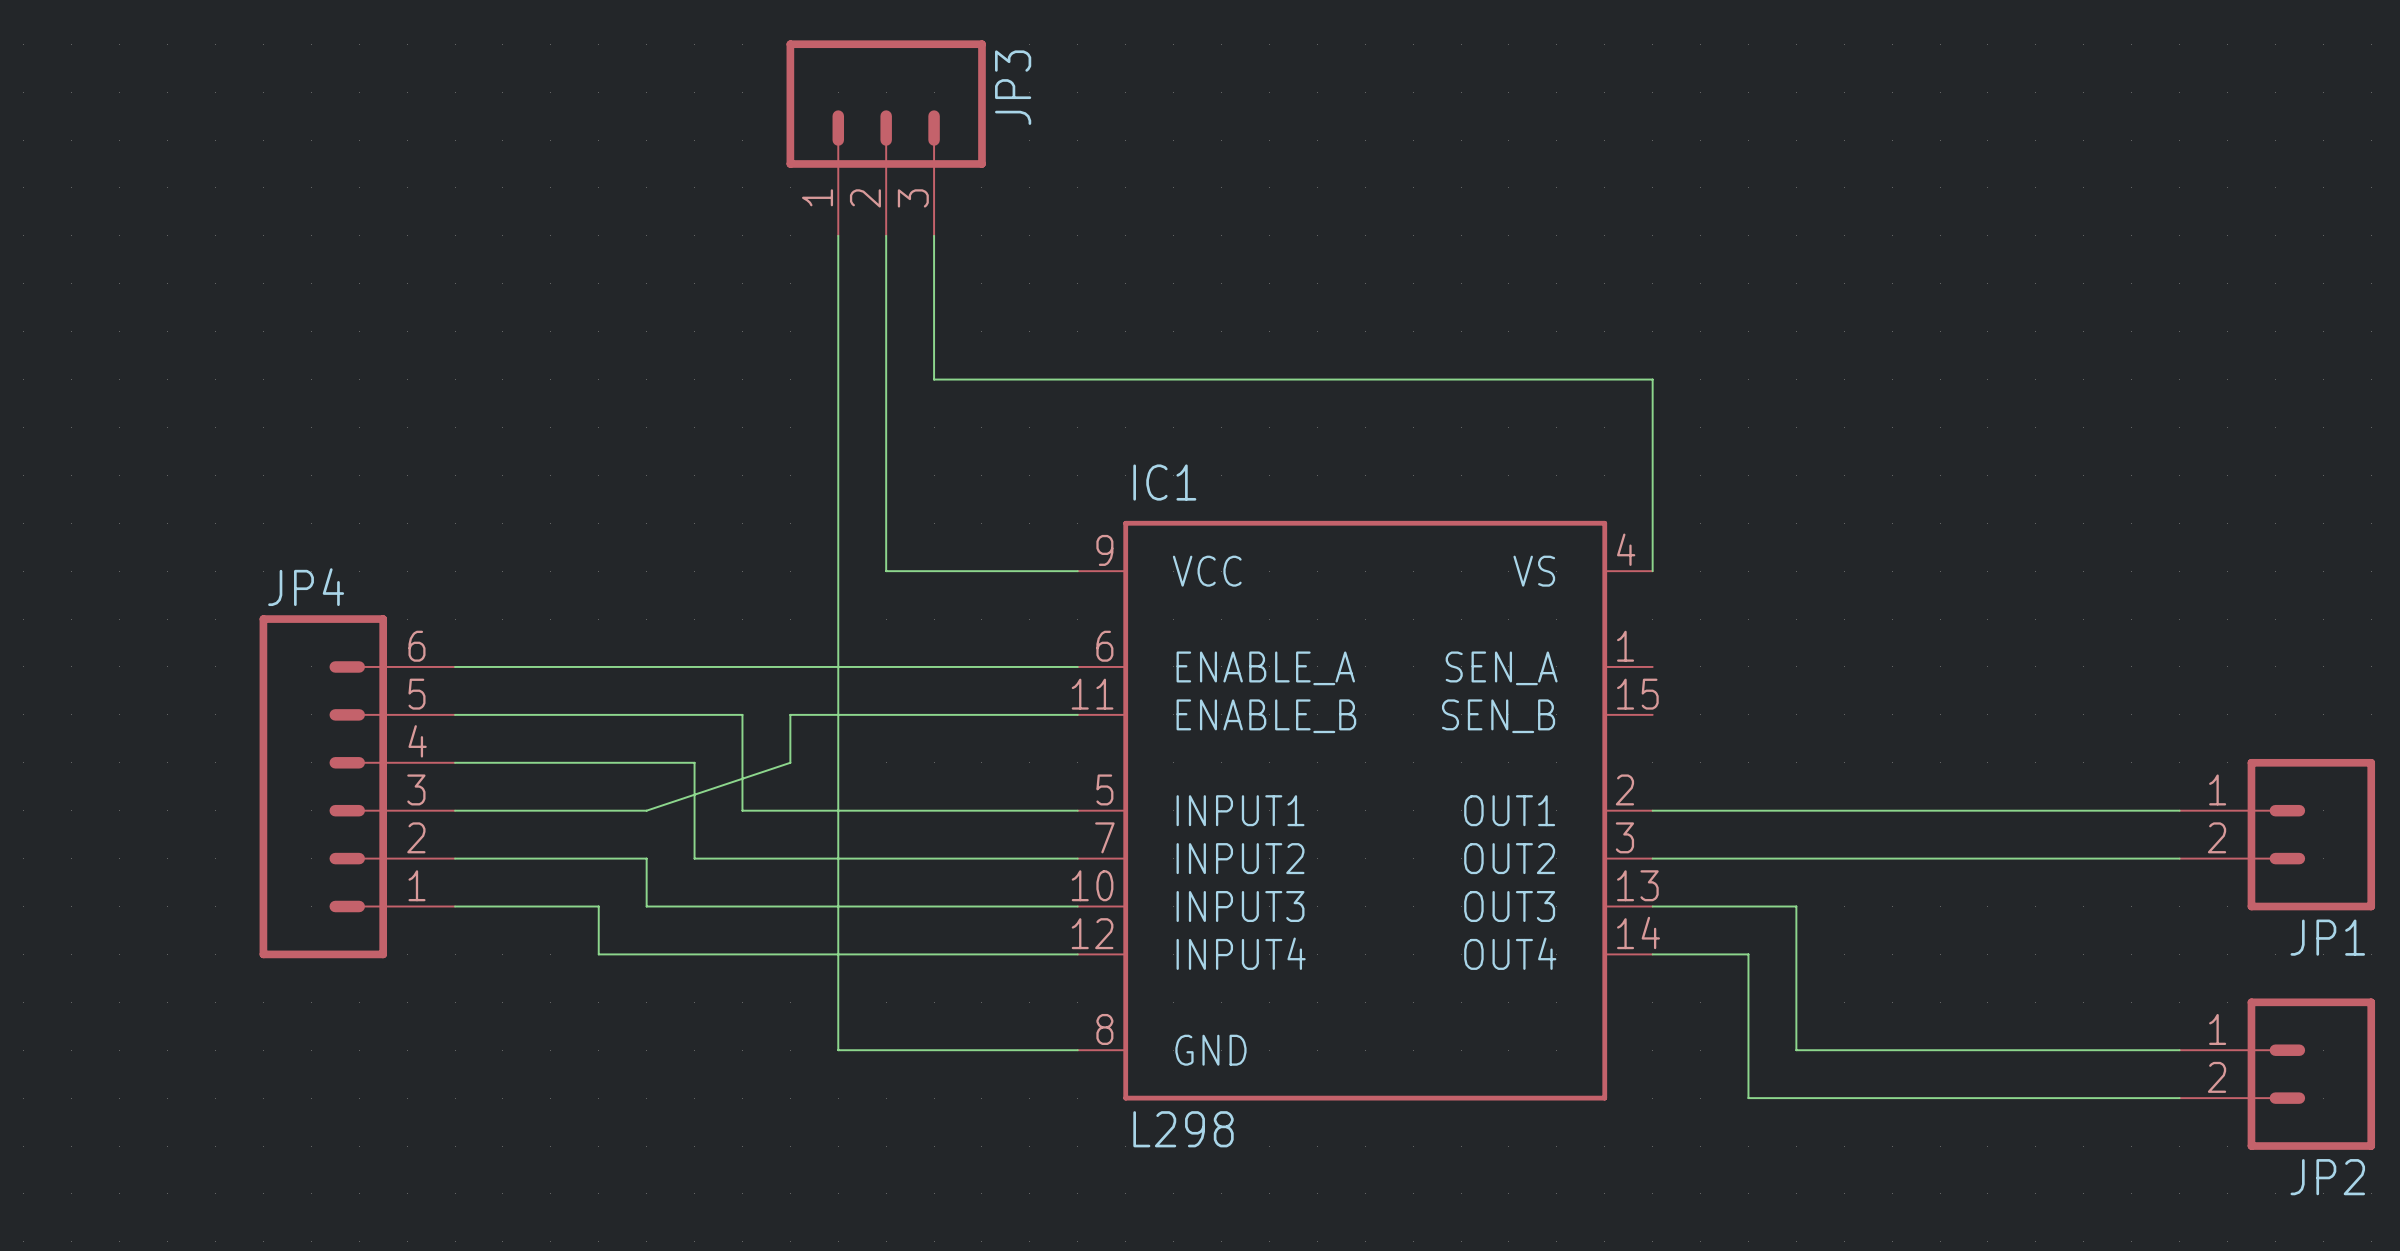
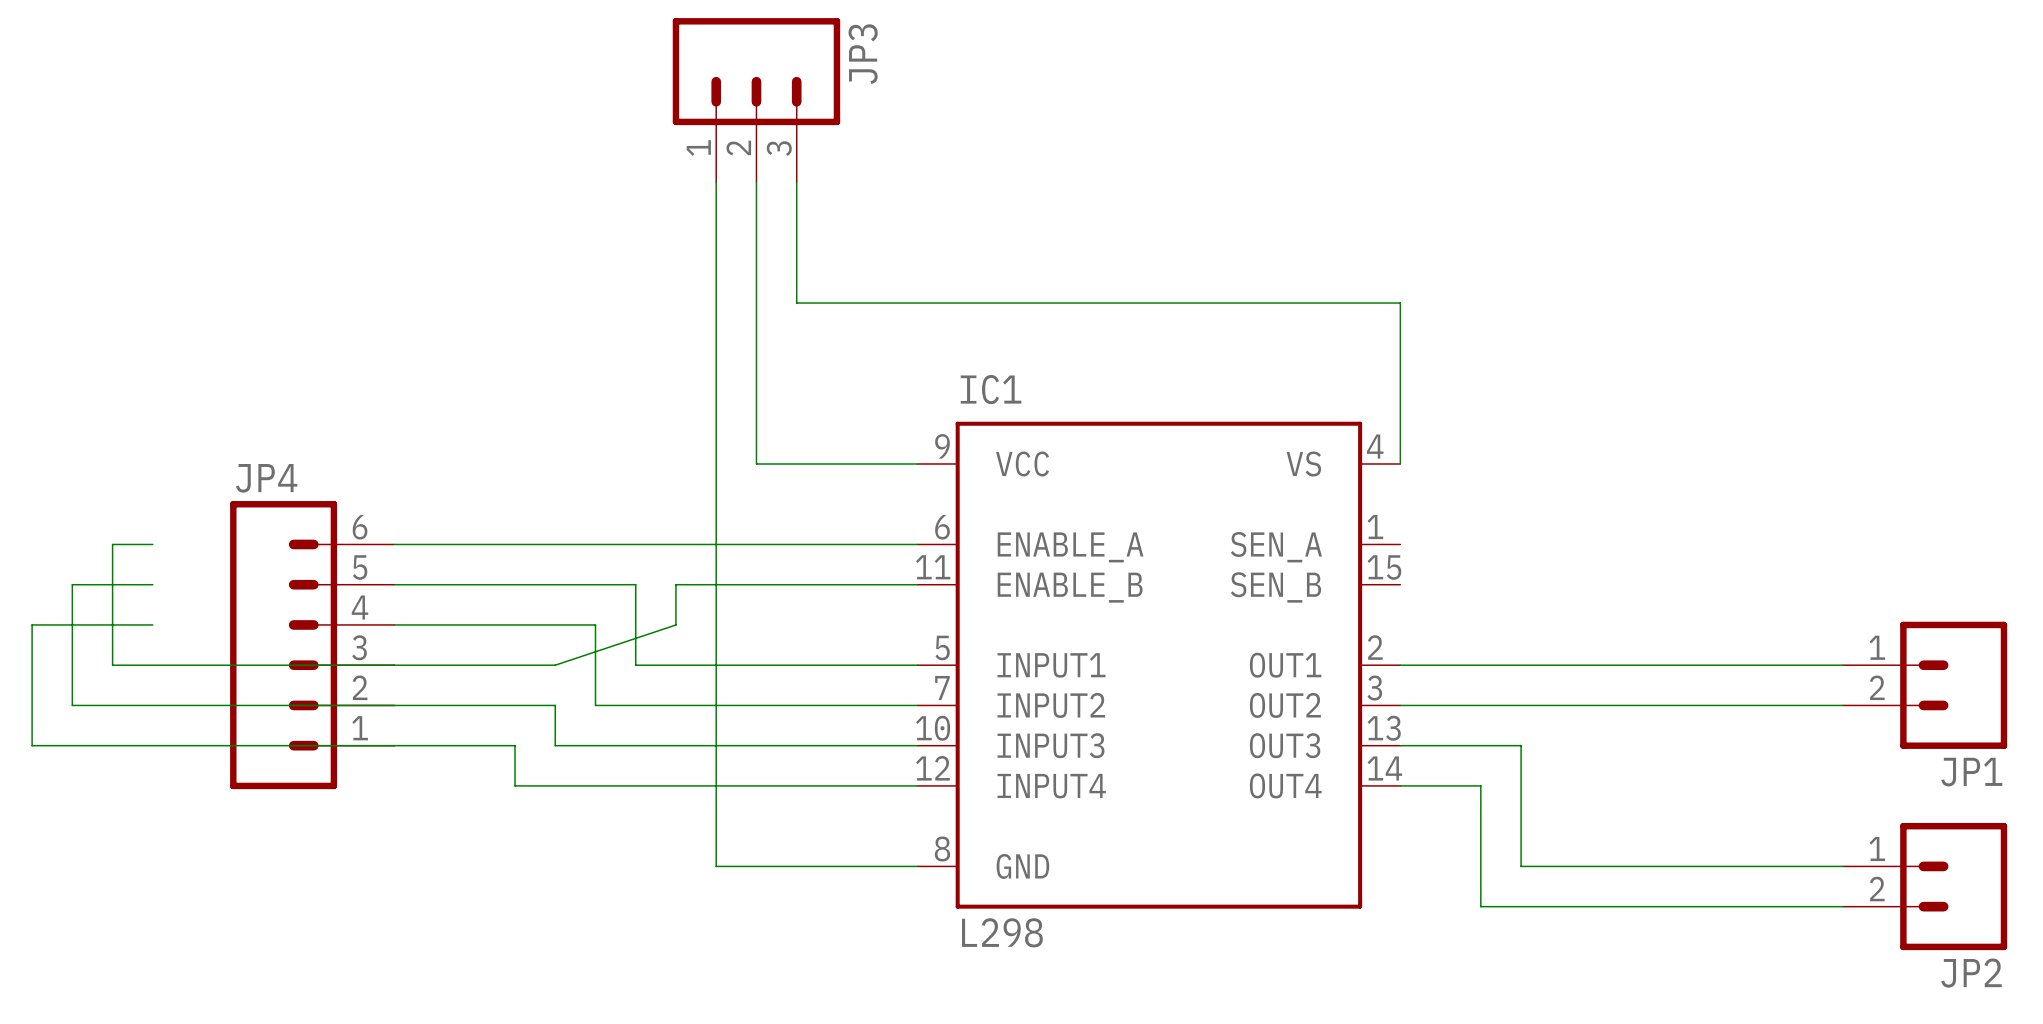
wire: none -> (152, 544) (112, 544) (112, 665) (394, 665)
wire: none -> (152, 584) (72, 584) (72, 705) (394, 705)
wire: none -> (152, 624) (32, 624) (32, 745) (394, 745)

